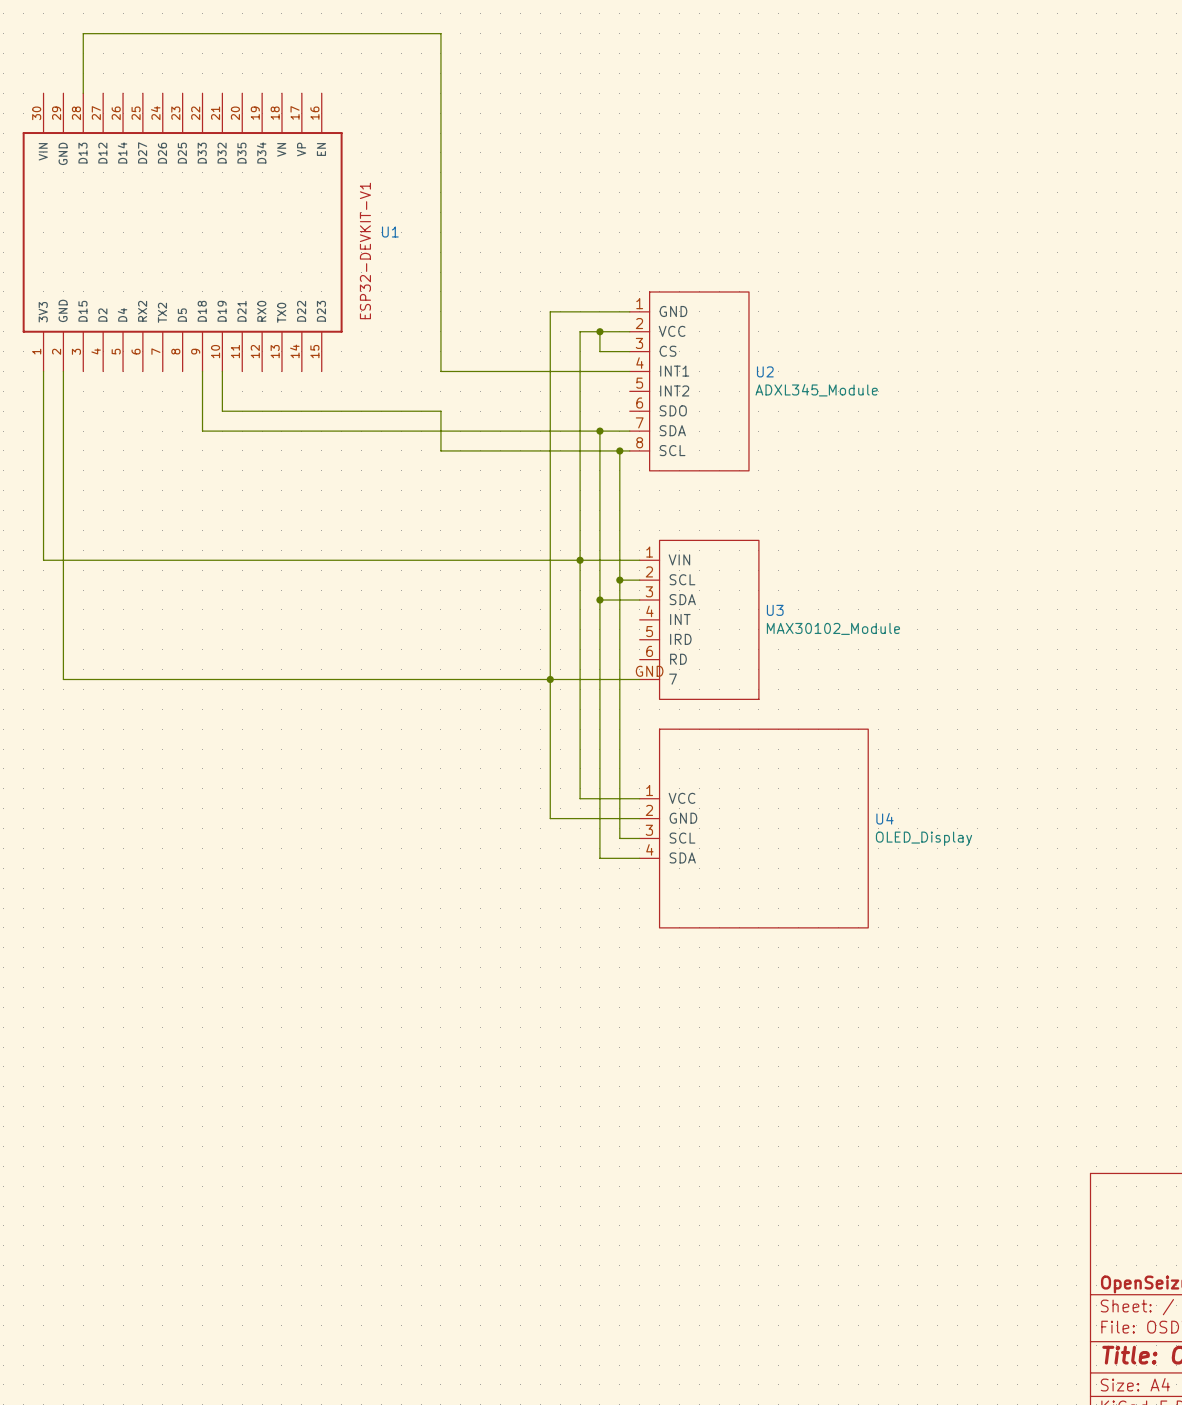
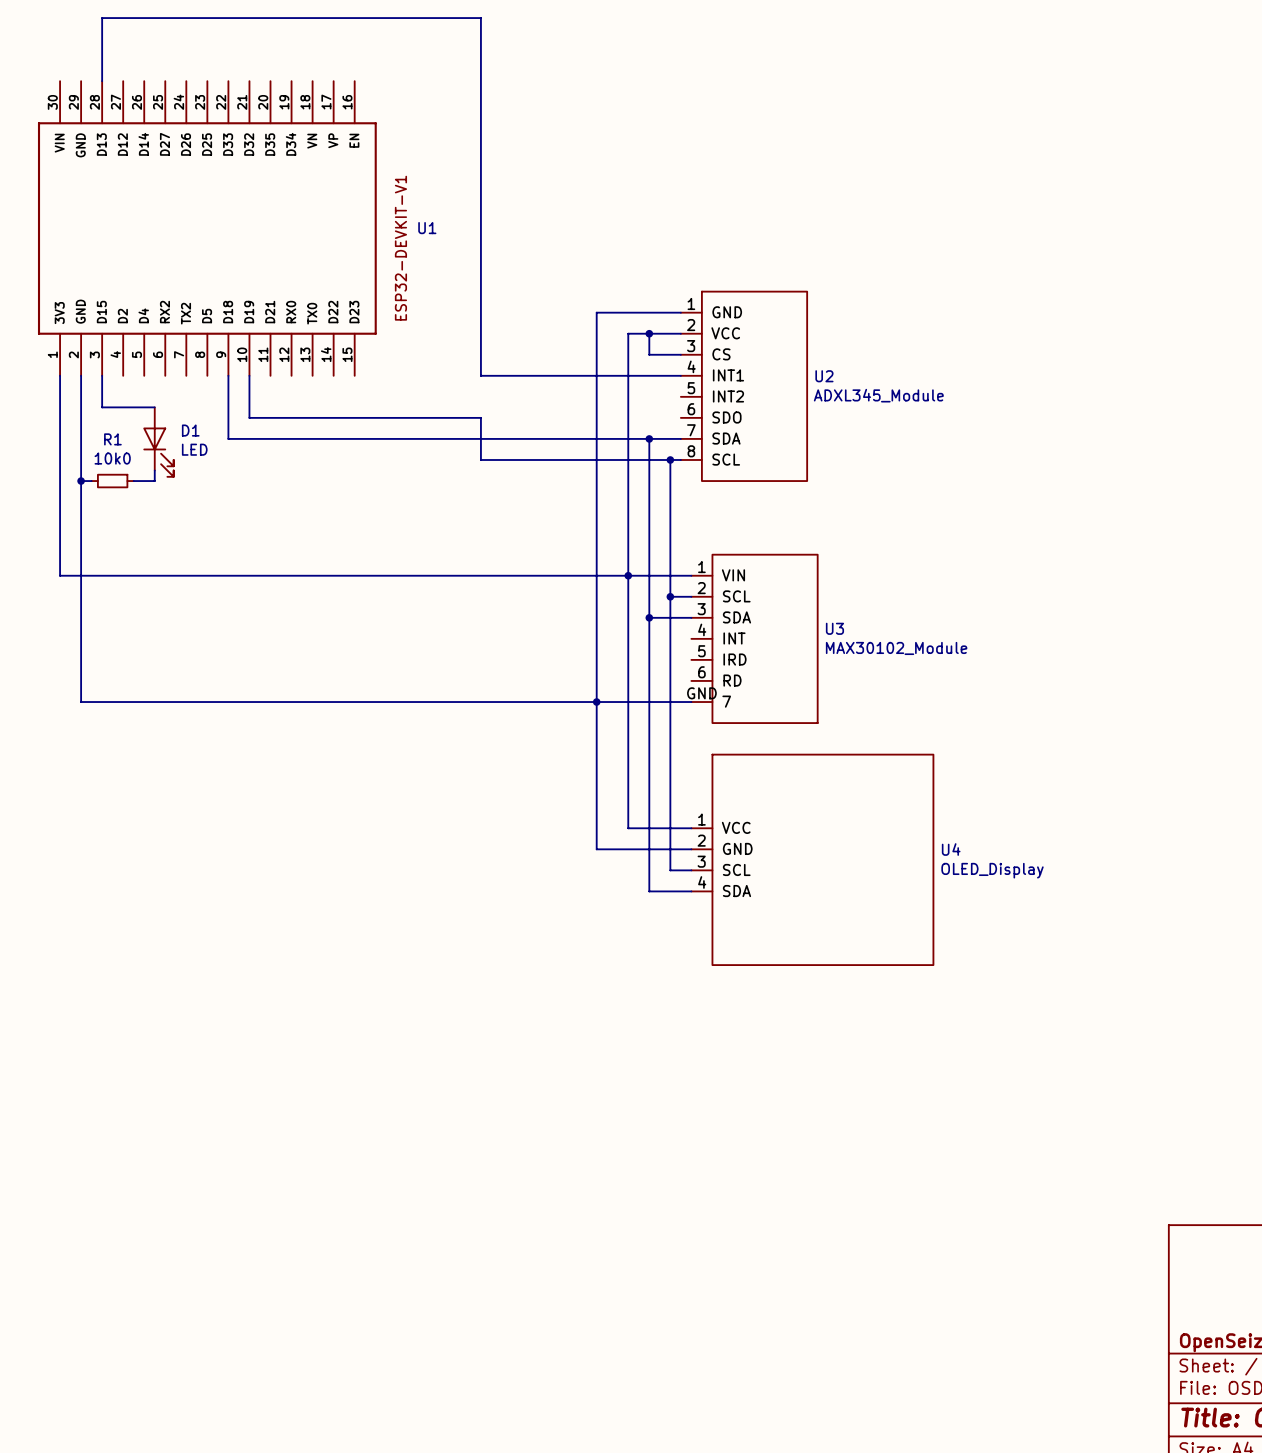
wire: none -> (102, 375) (102, 407) (154, 407)
D1: none -> LED (158, 442)
wire: none -> (154, 470) (154, 481) (133, 481)
wire: none -> (81, 481) (91, 481)
junction: none -> (81, 481)
R1: none -> 10k0 (112, 481)

